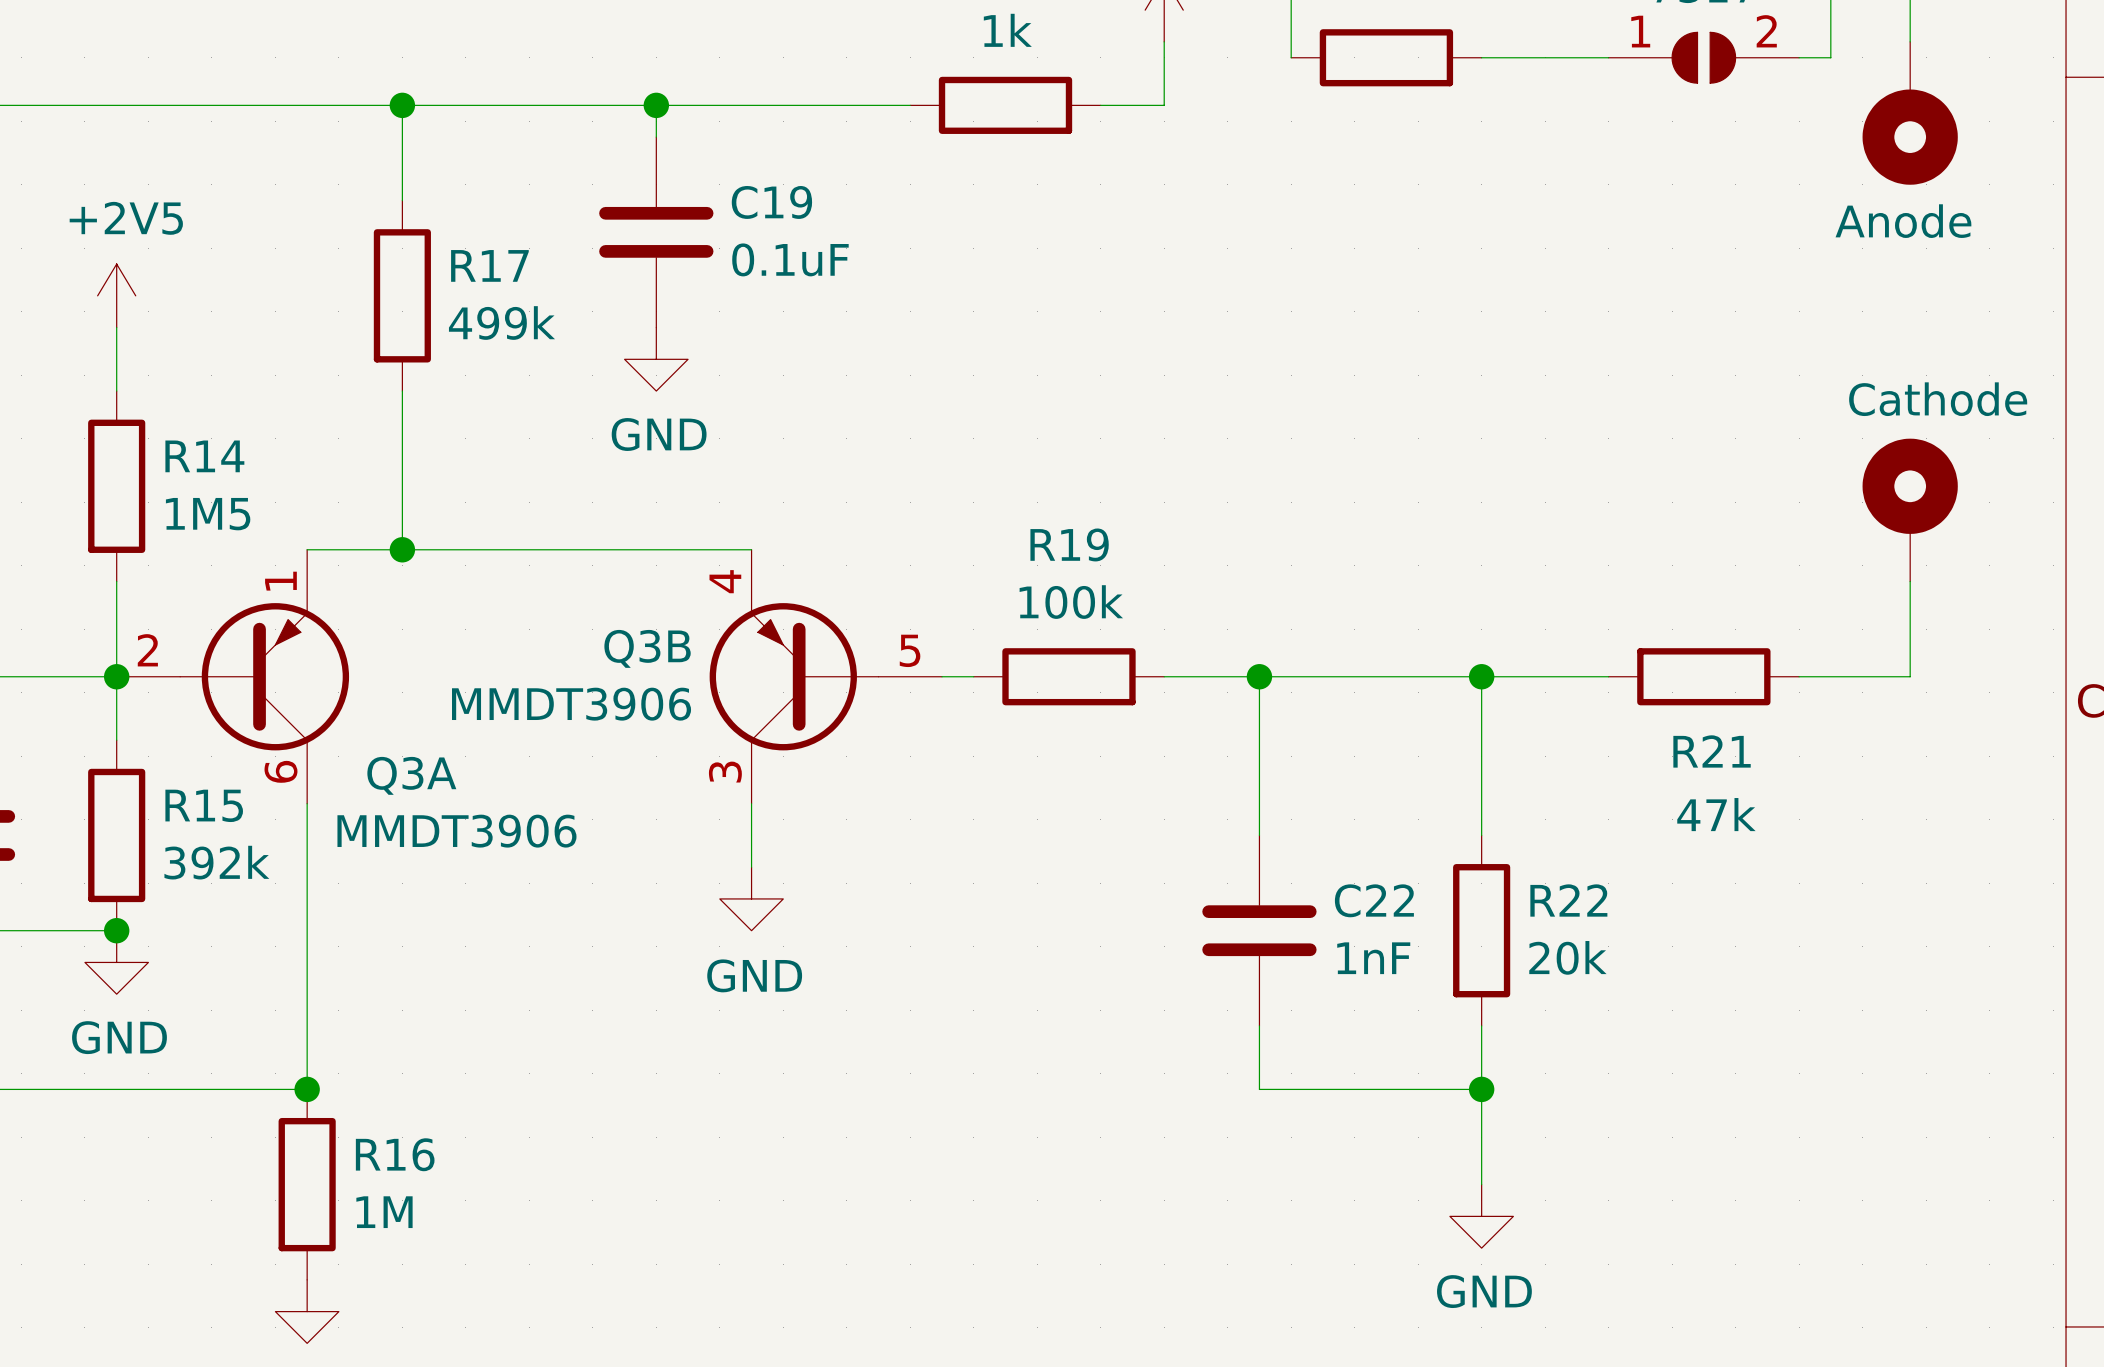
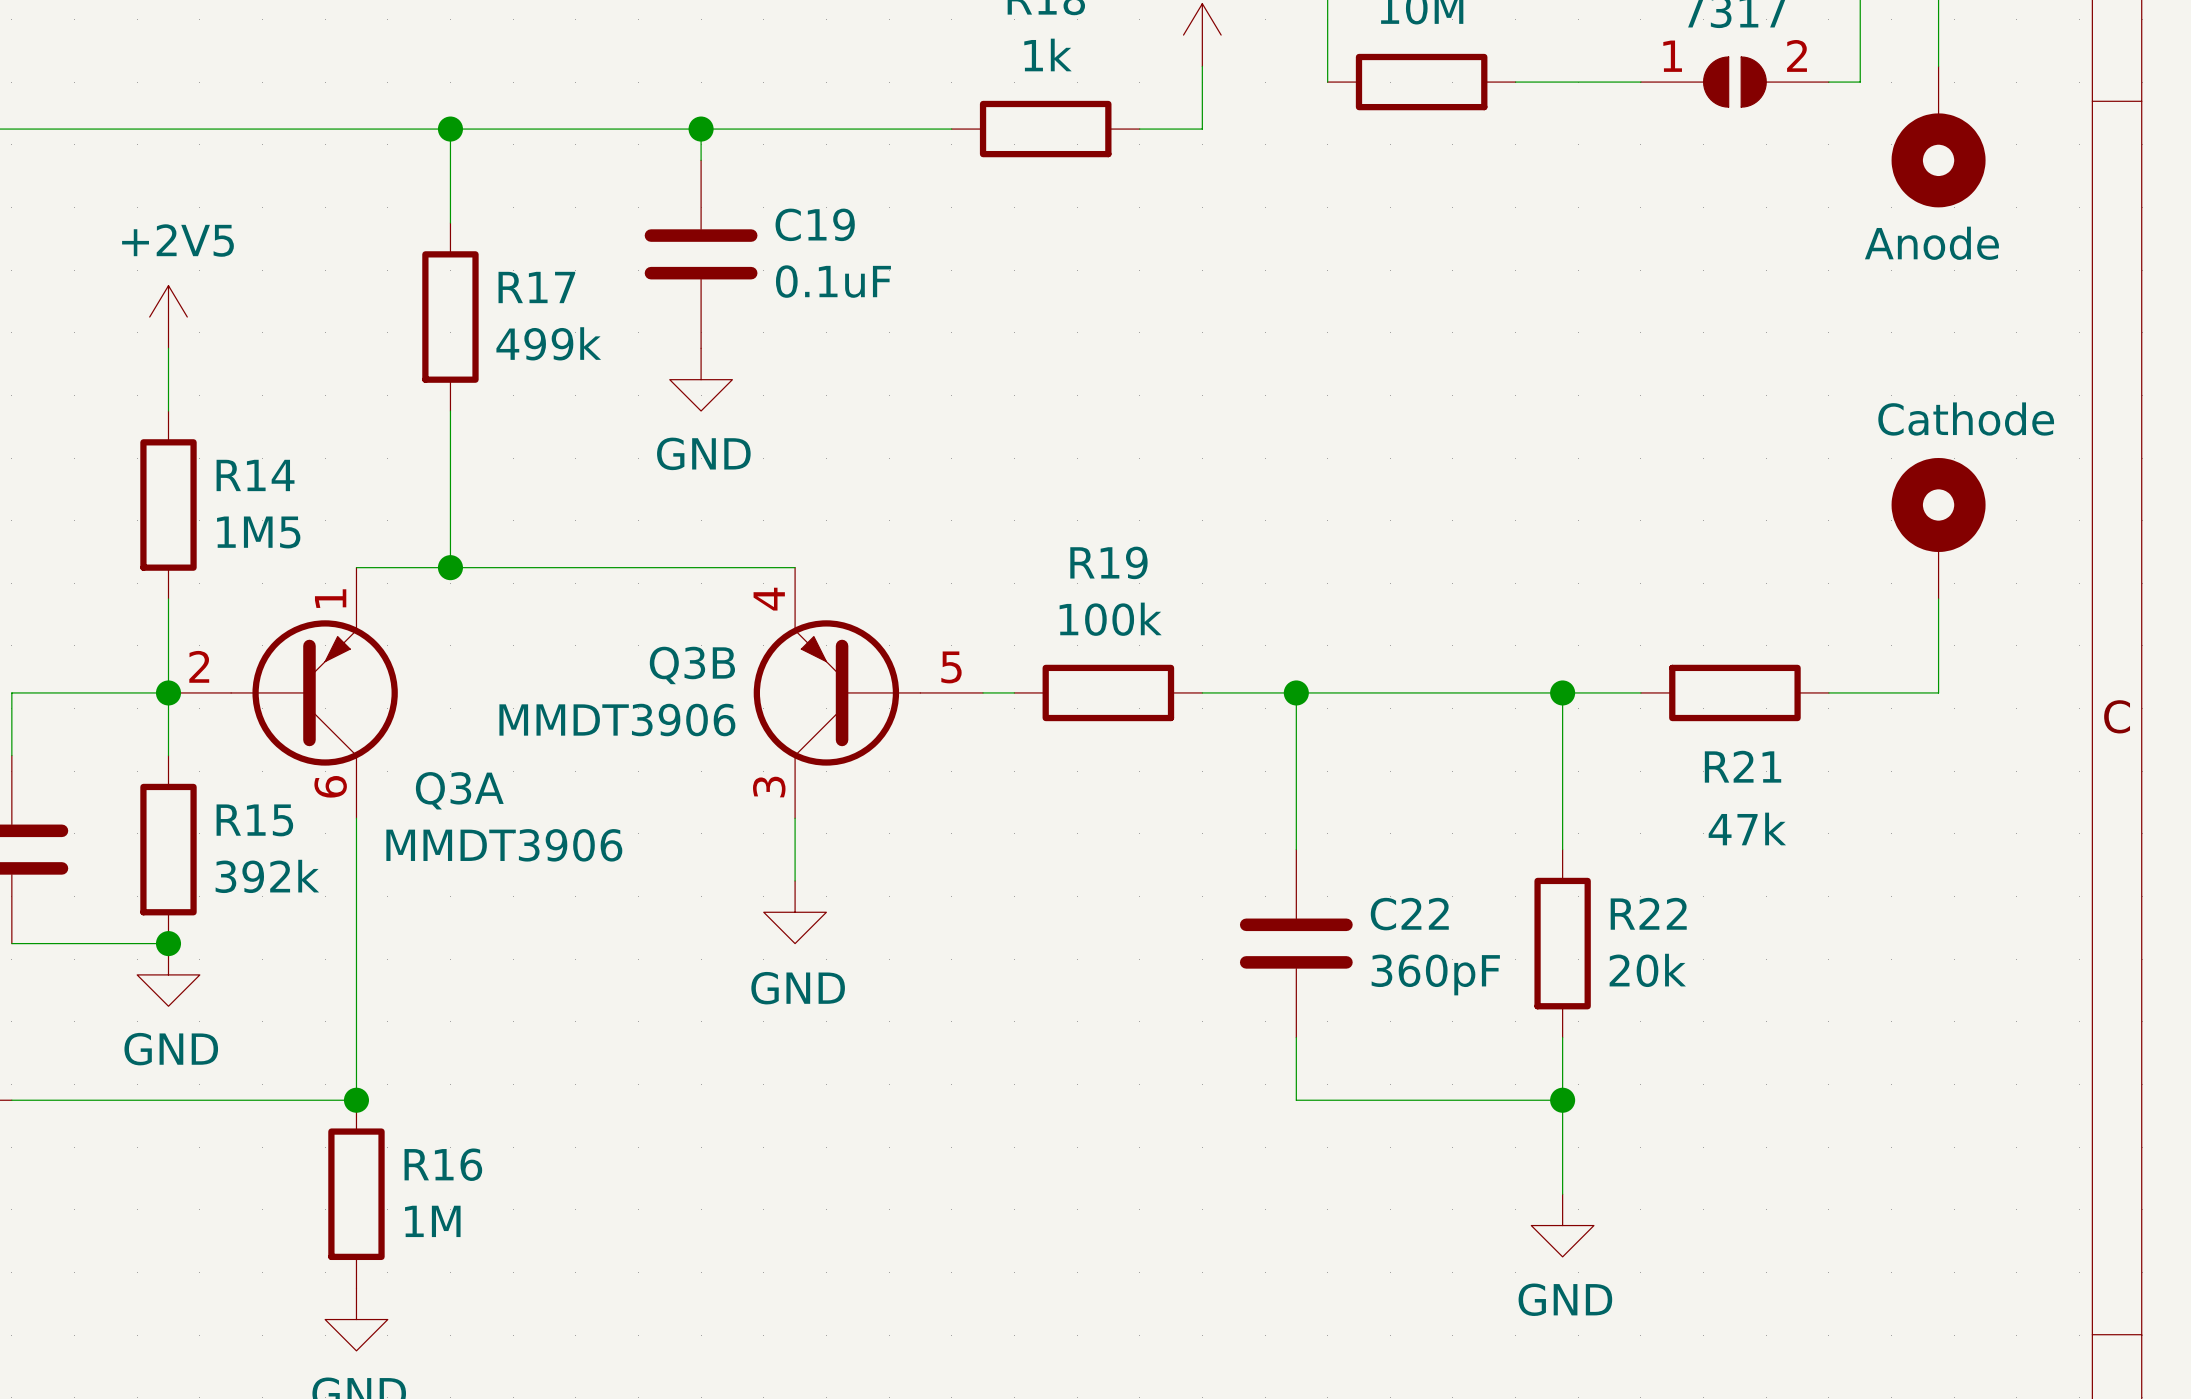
wire: (1481, 676) (1481, 835) -> (1562, 692) (1562, 849)
junction position: (1481, 676) -> (1562, 692)
R22 position: (1481, 930) -> (1562, 943)
C22 value: 1nF (1373, 958) -> 360pF (1435, 974)
wire: (1481, 1025) (1481, 1184) -> (1562, 1037) (1562, 1194)
wire: none -> (1515, 1100) (1562, 1100)
junction position: (1481, 1089) -> (1562, 1100)
power symbol position: GND (1481, 1216) -> GND (1562, 1225)

